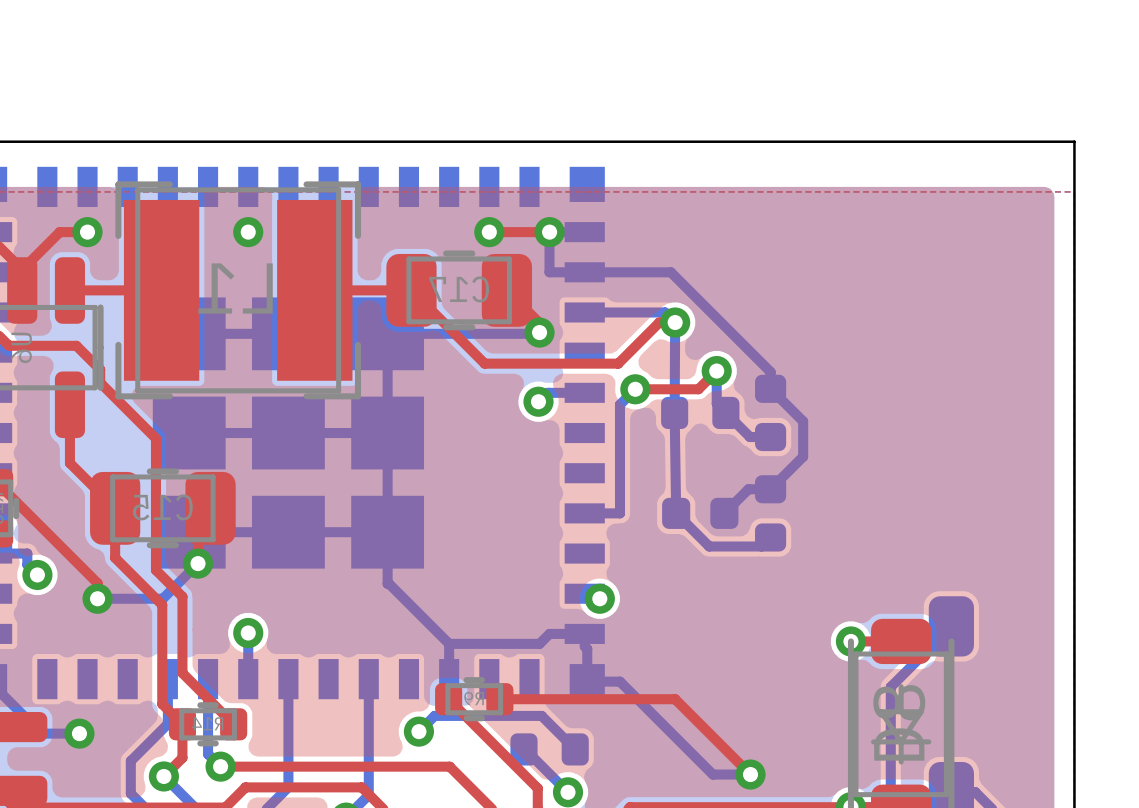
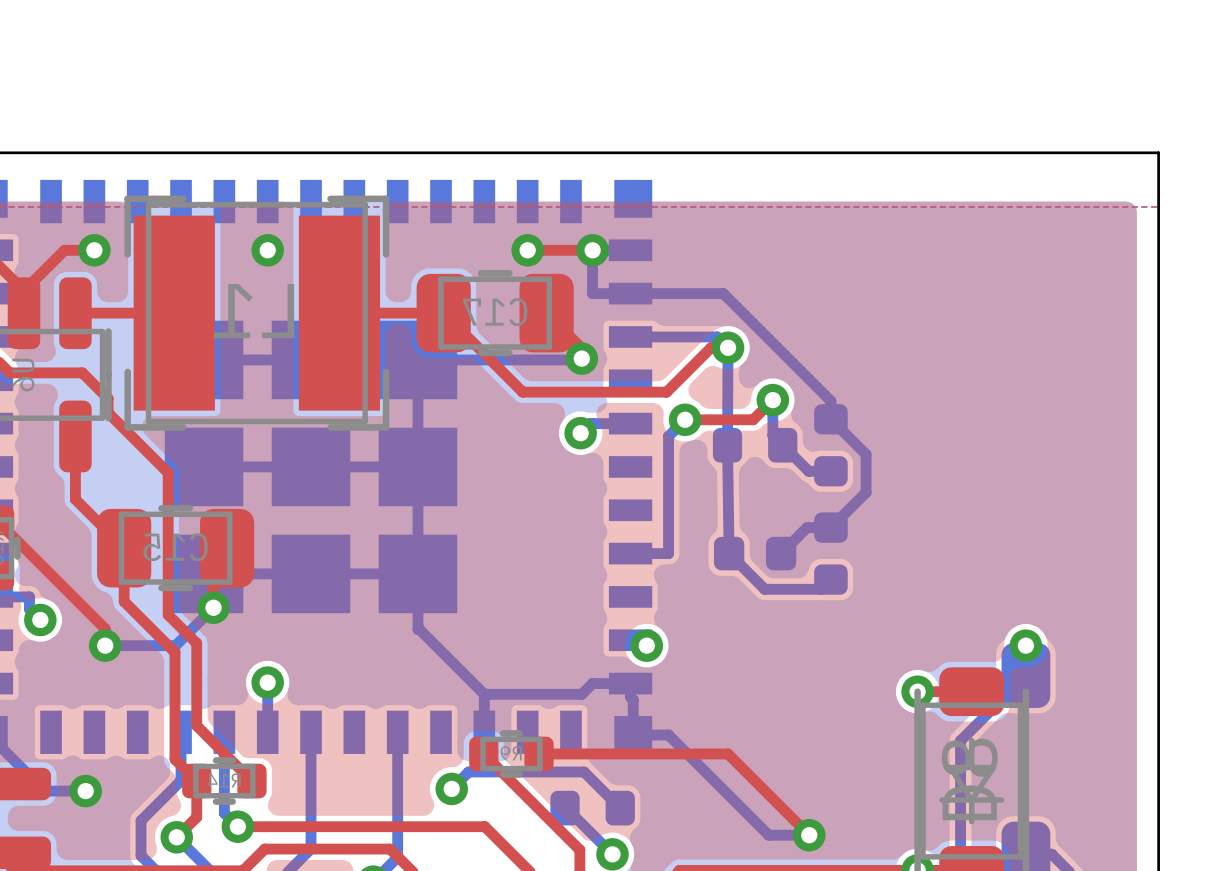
via: none -> (1025, 645)

